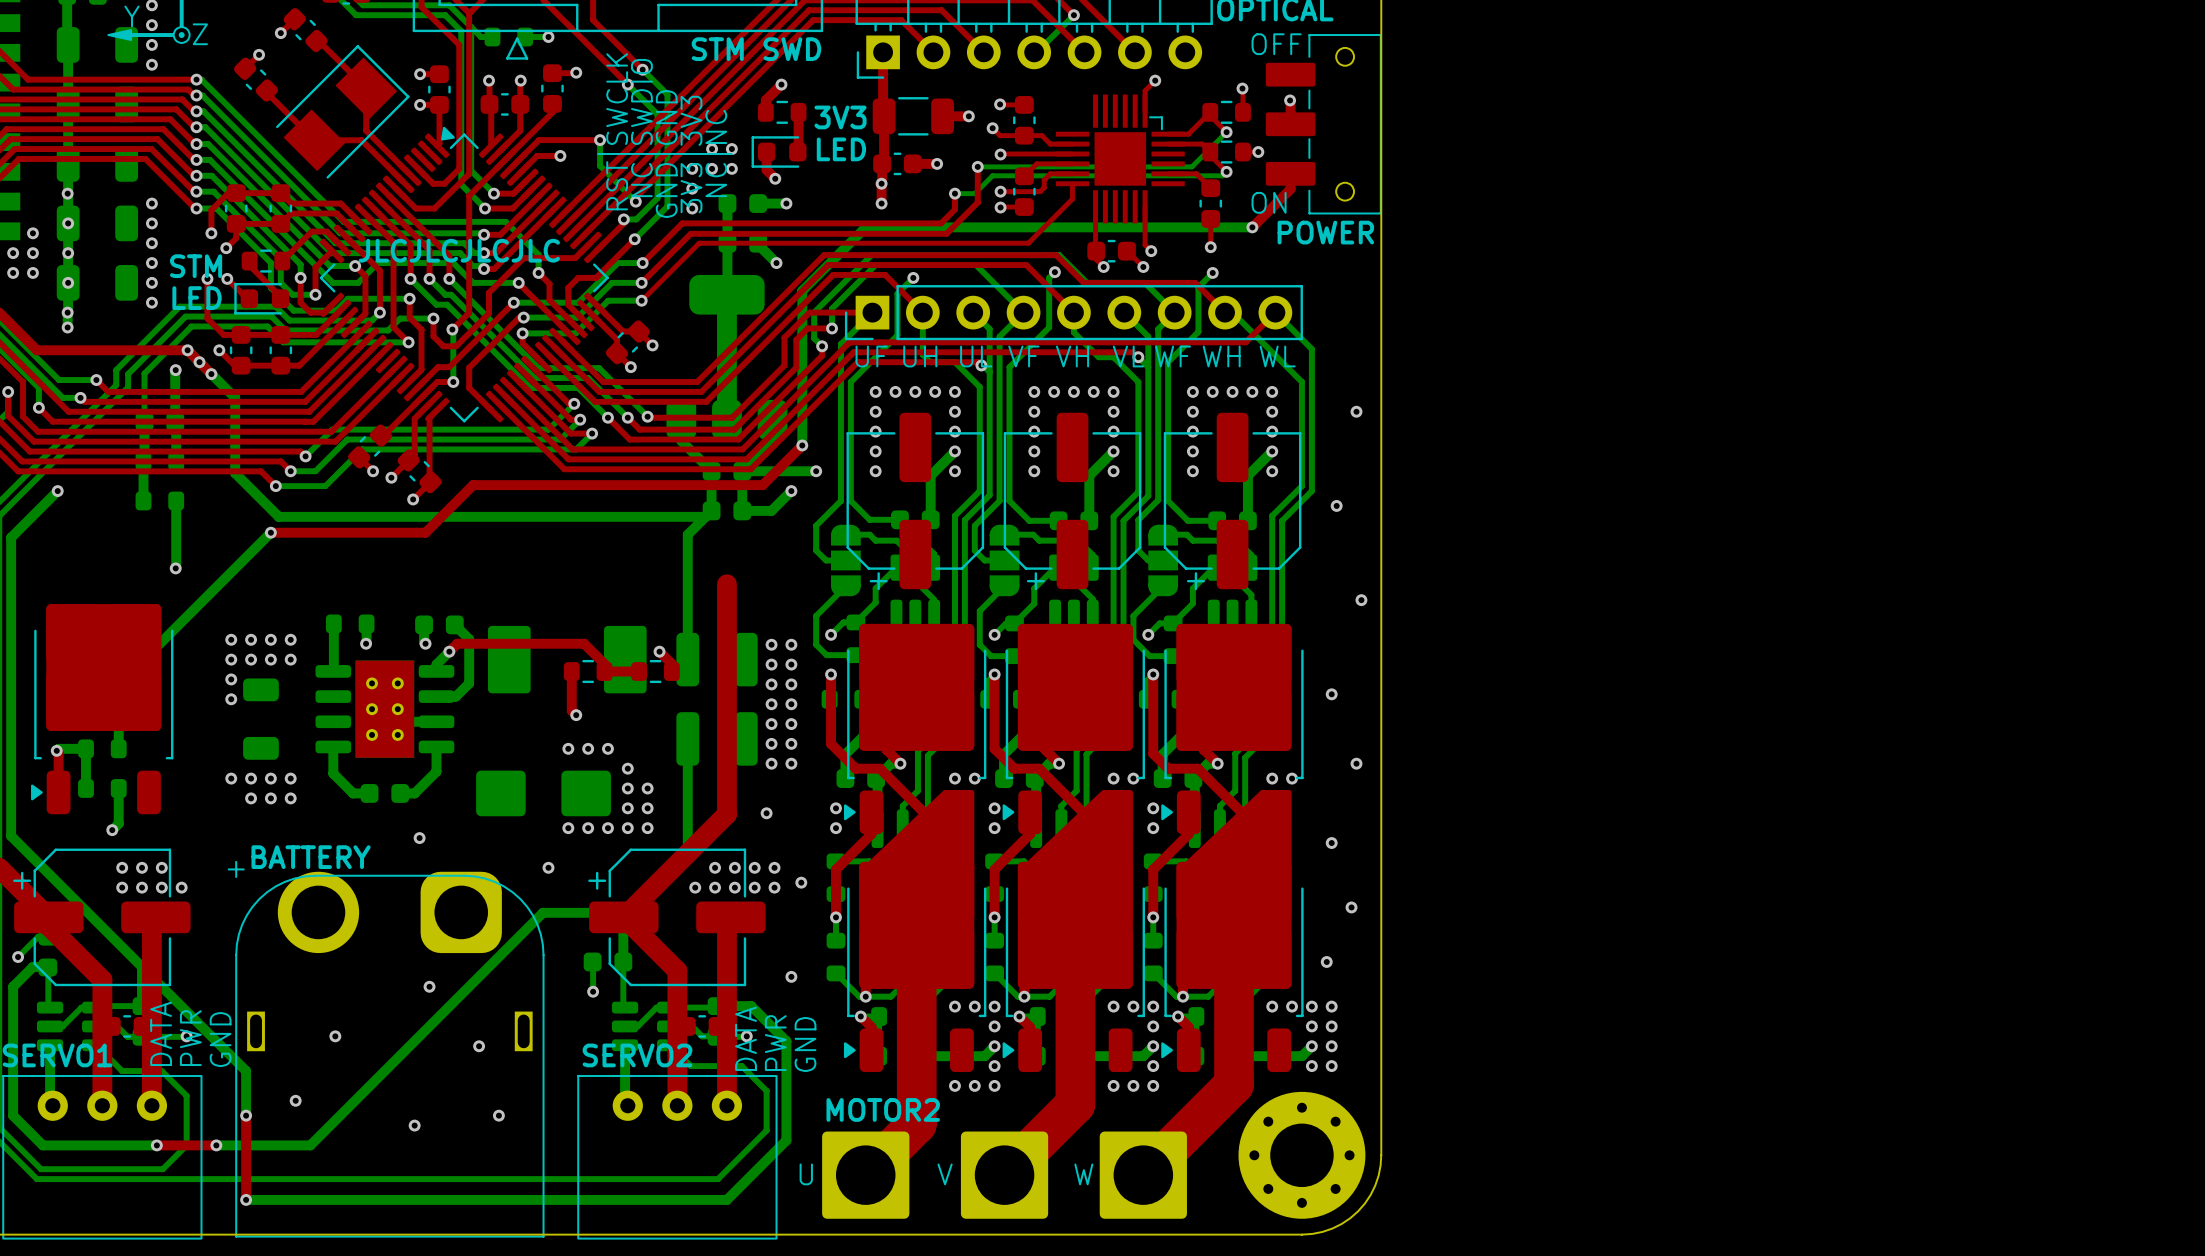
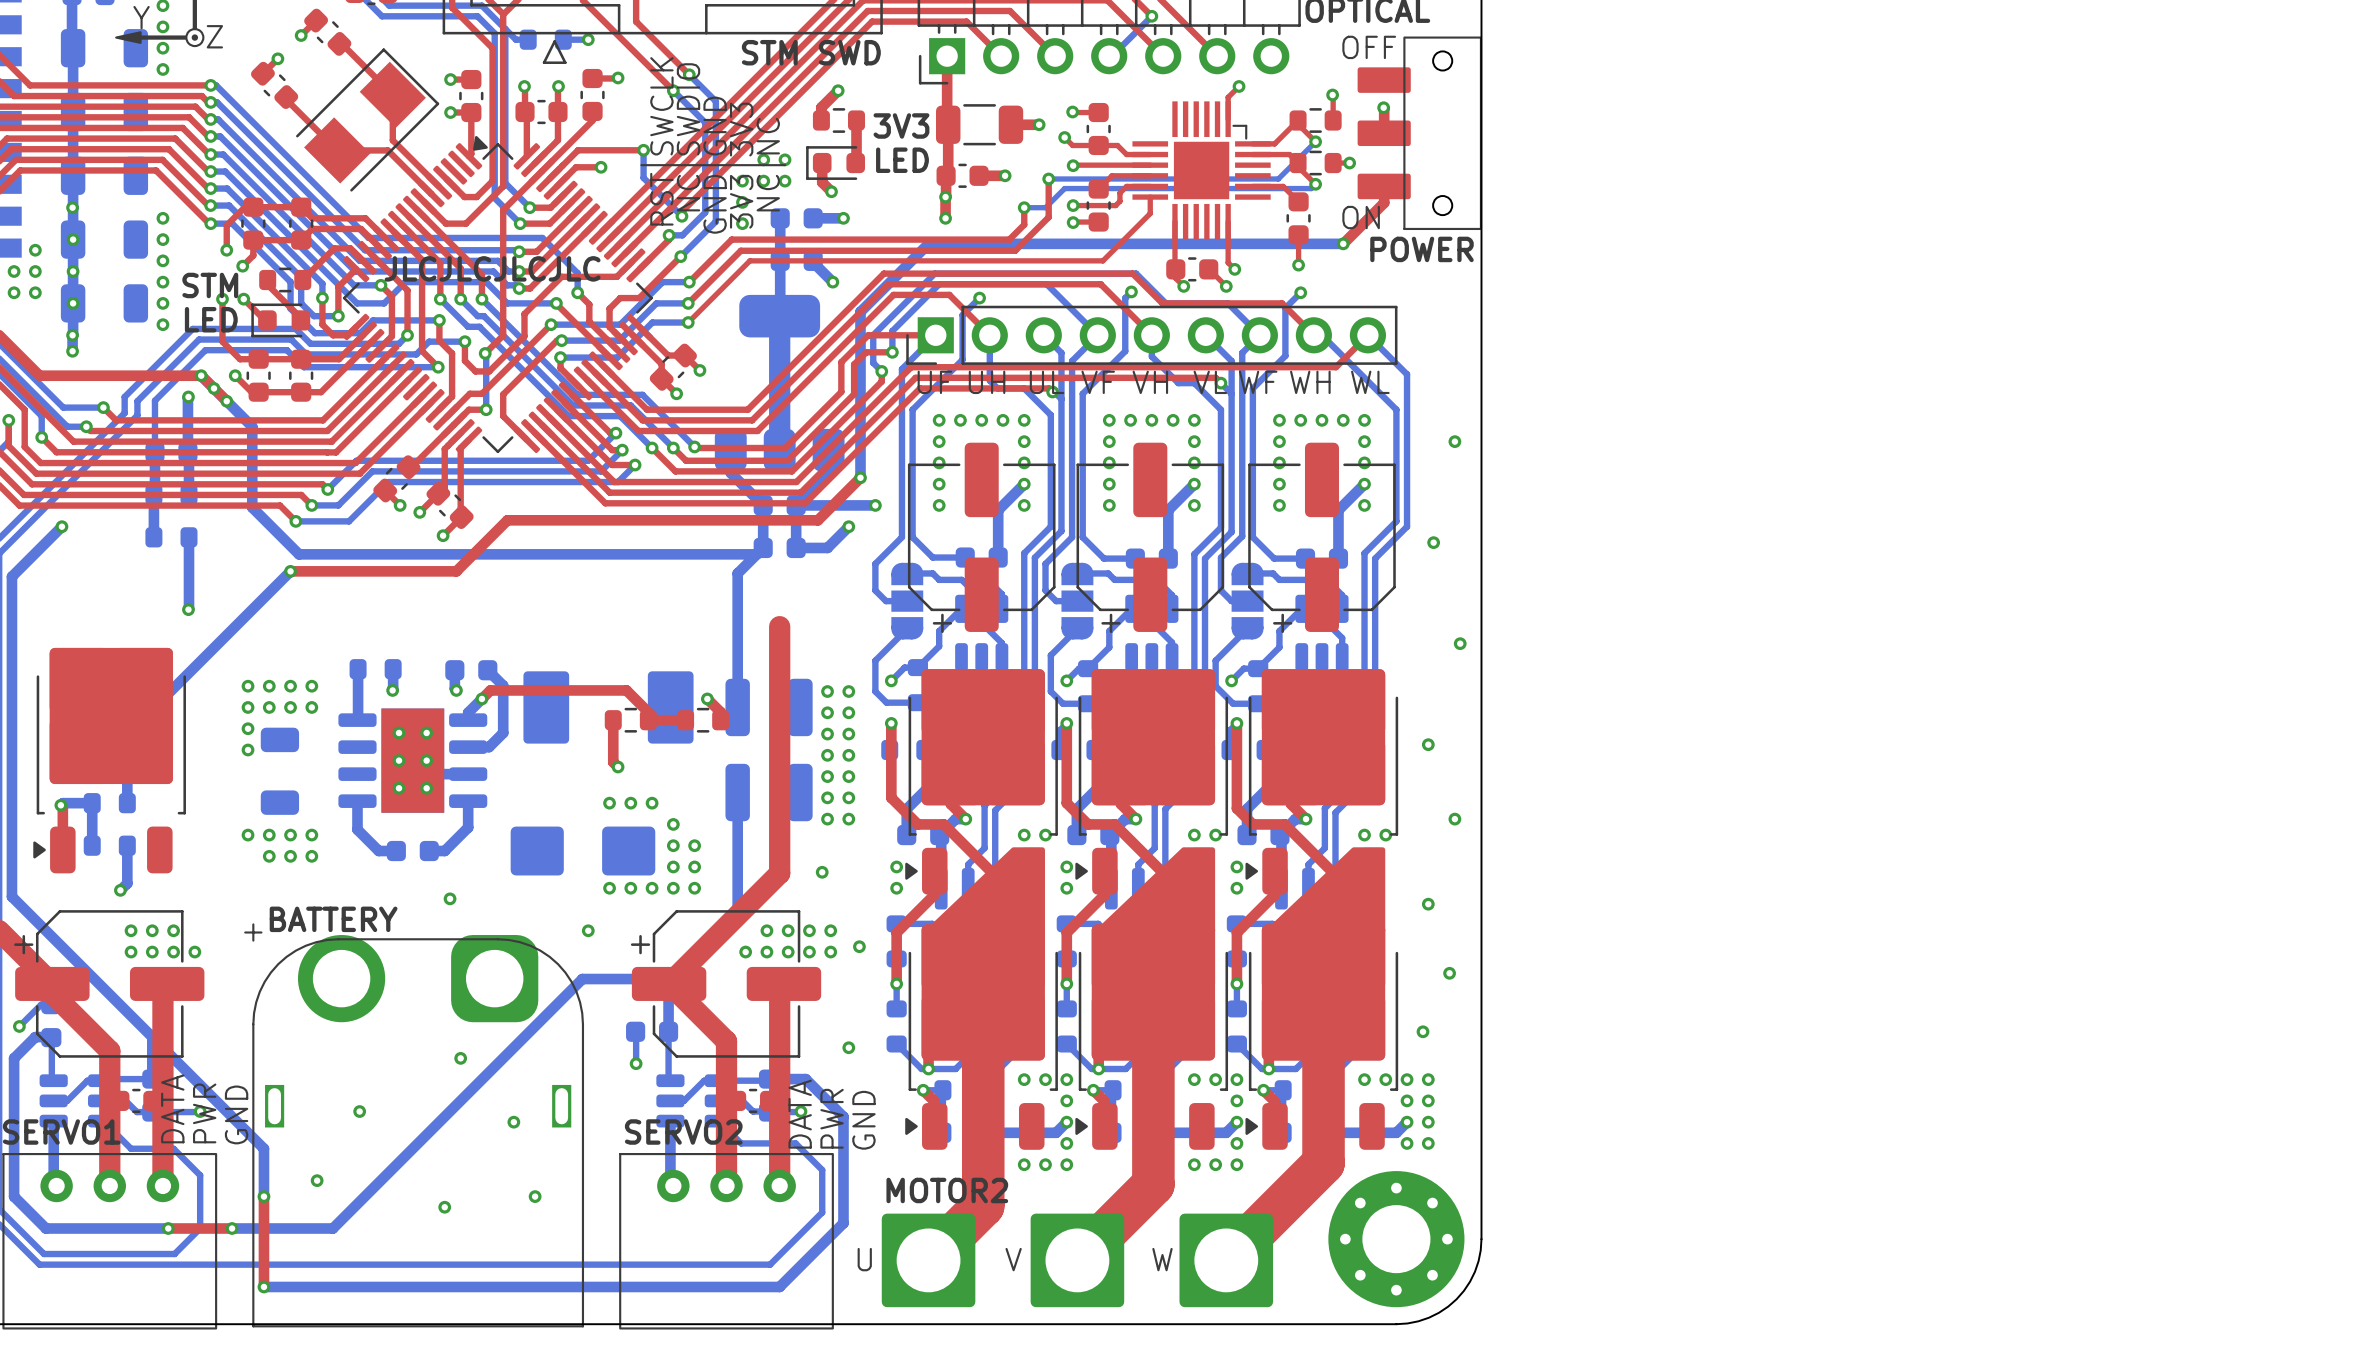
part footprint: [1265, 34, 1382, 215] -> [1357, 36, 1483, 231]

